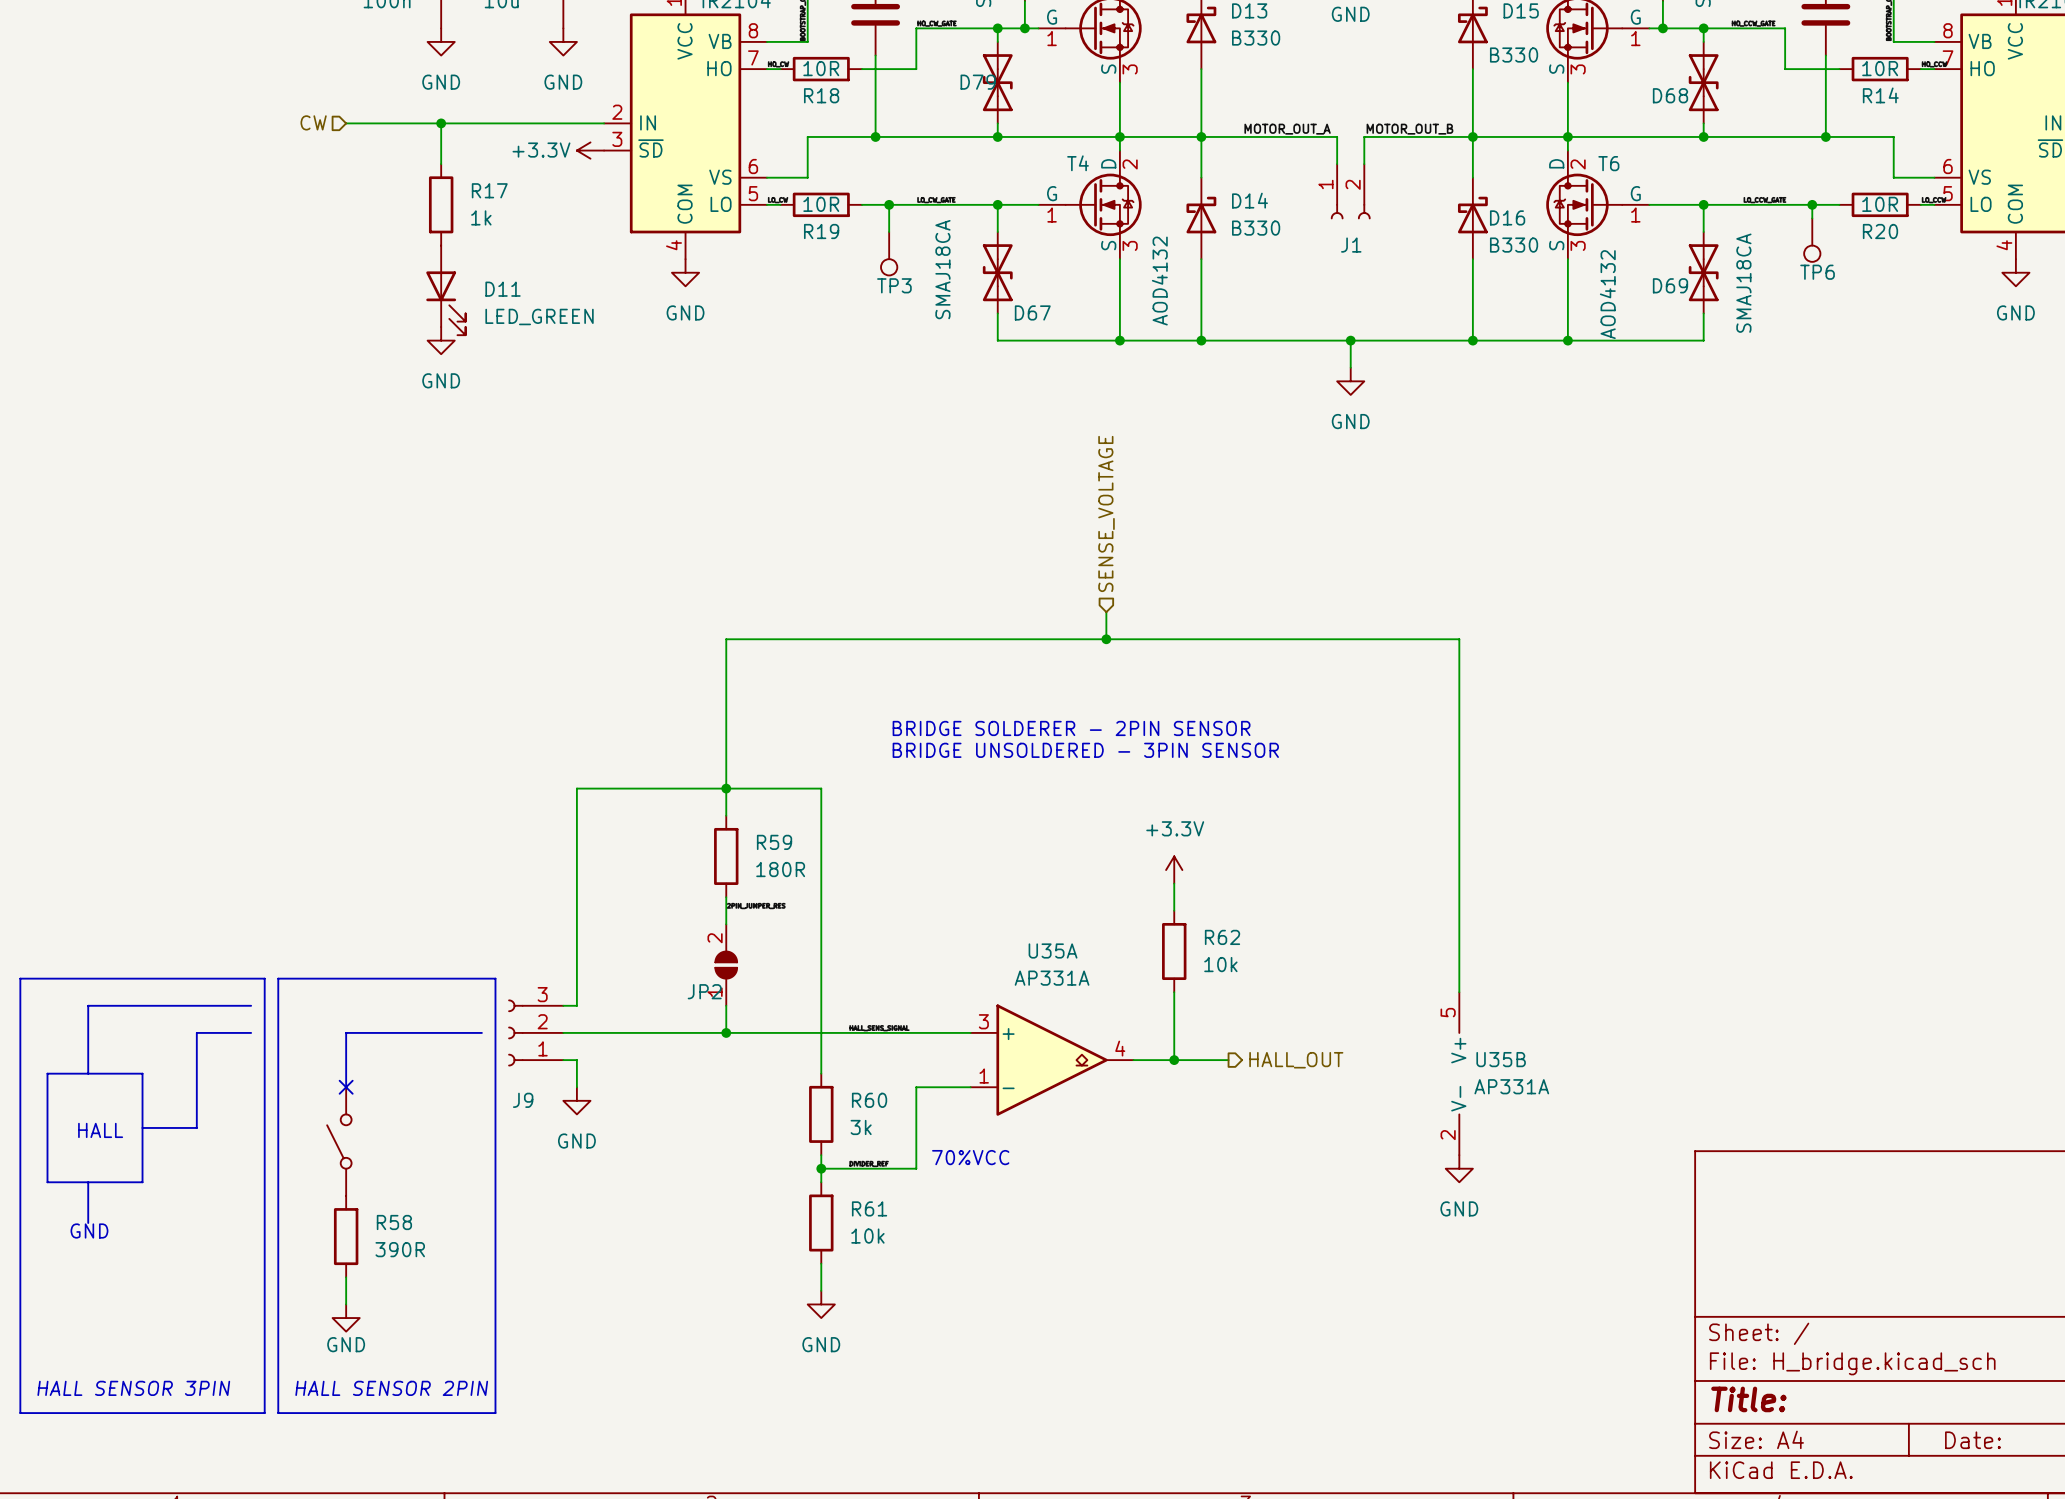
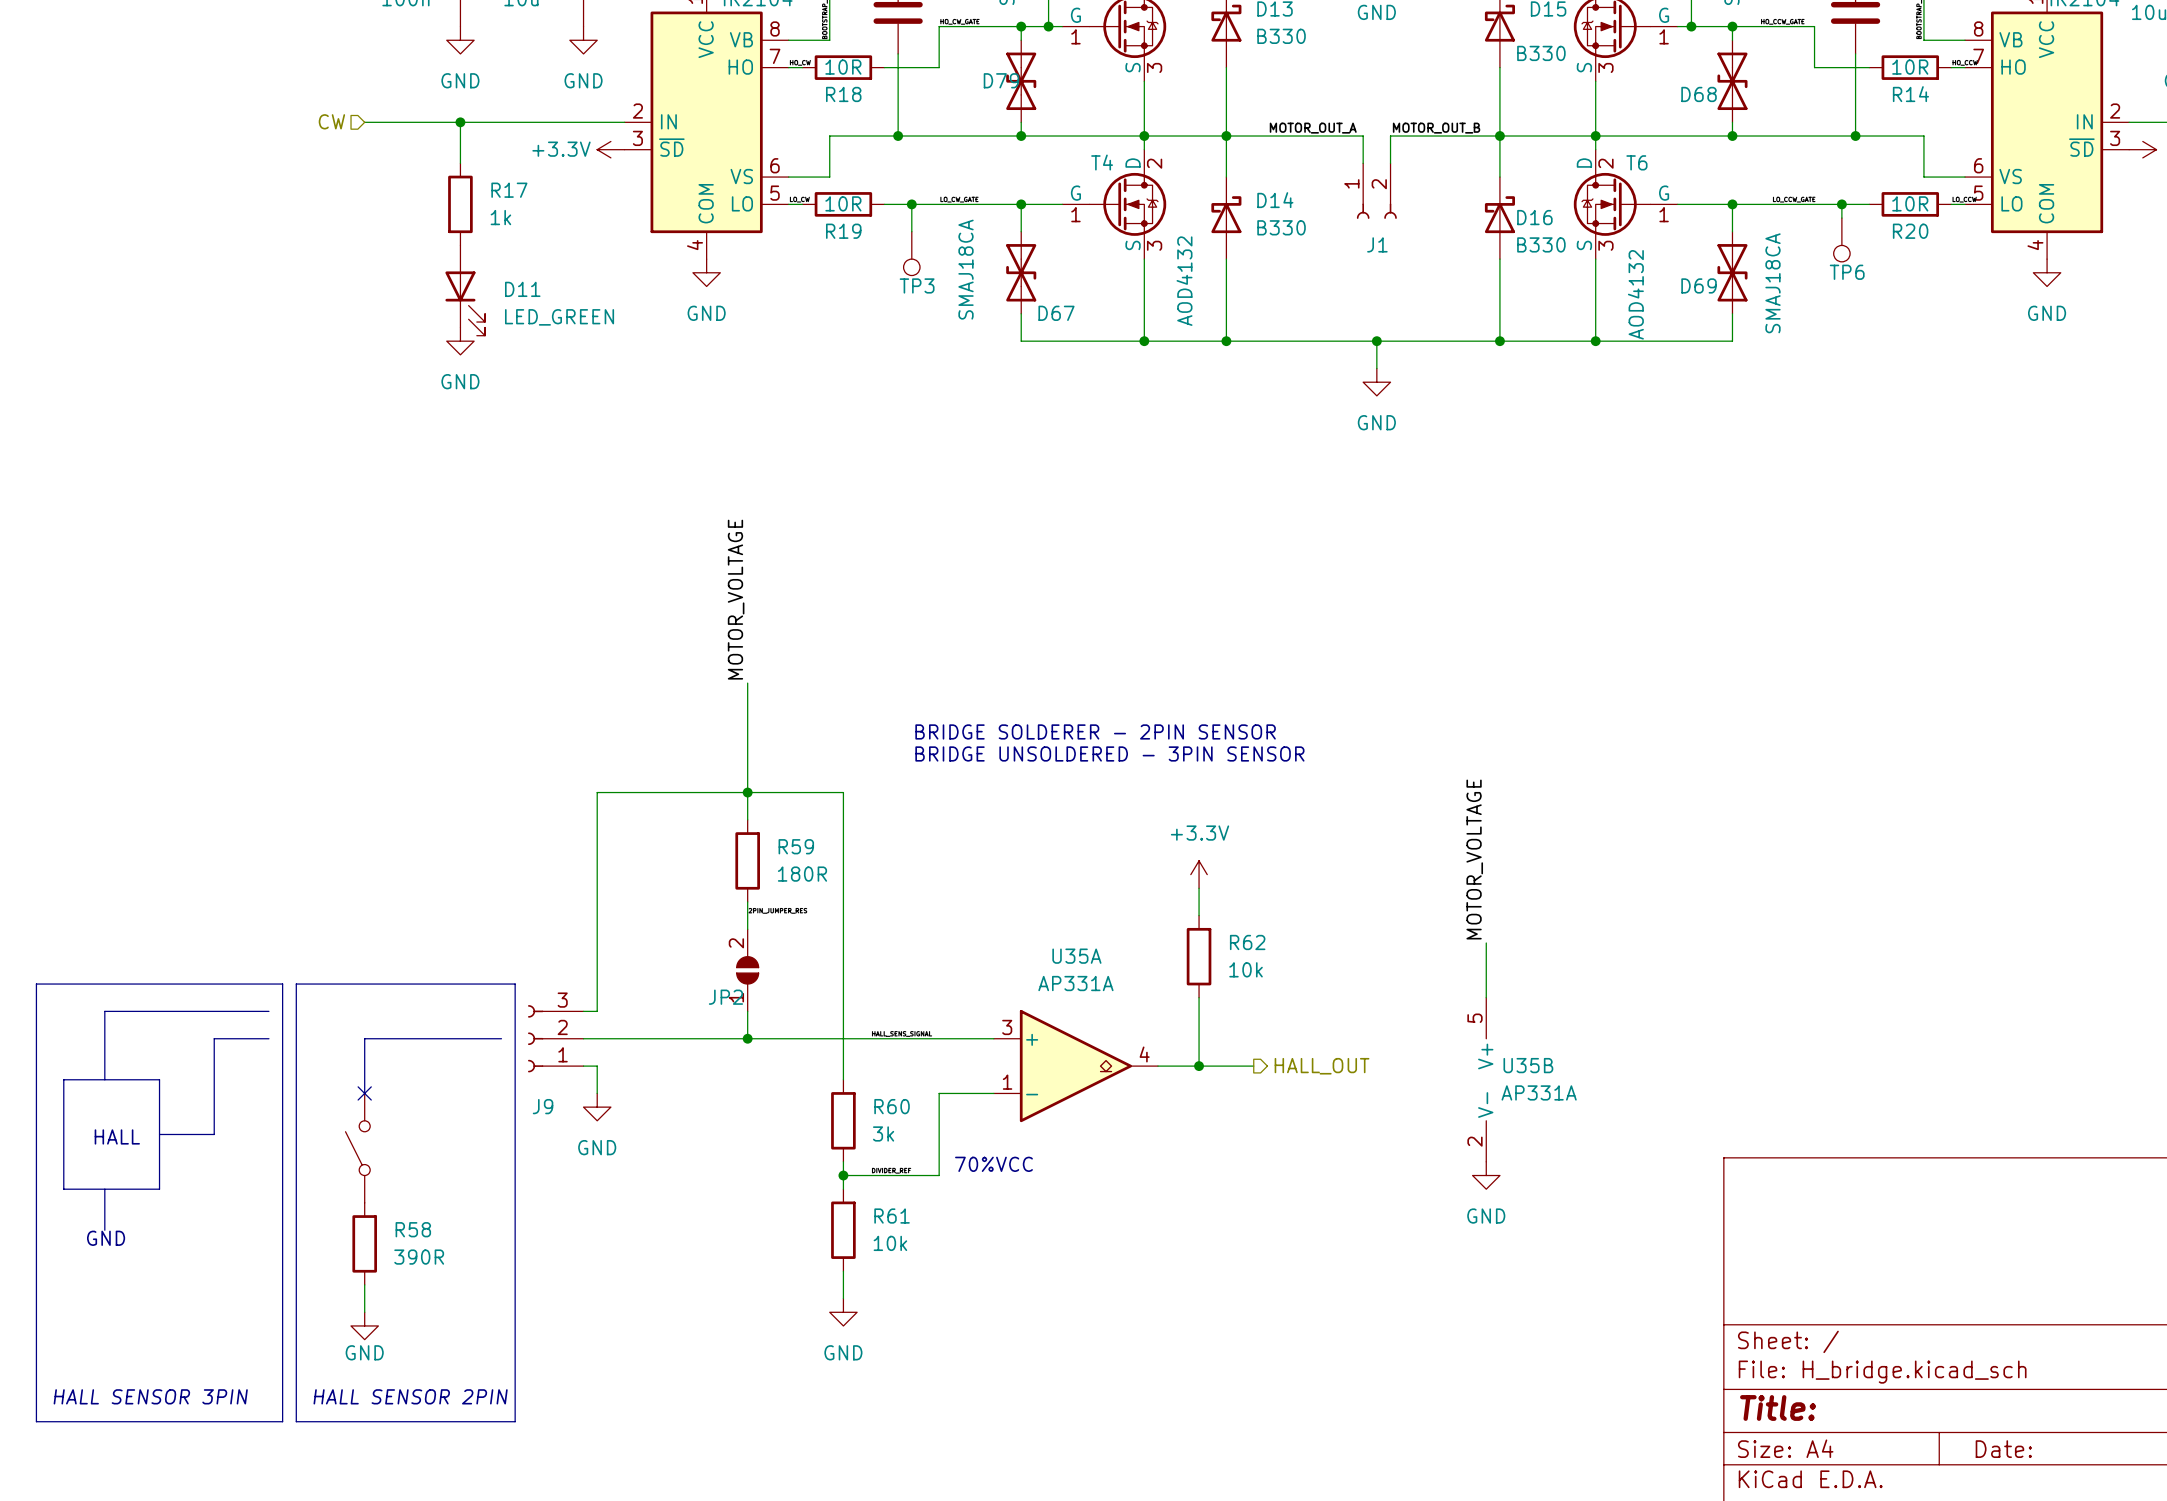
hierarchical label: SENSE_VOLTAGE (1106, 513) -> none
label: none -> MOTOR_VOLTAGE (736, 599)
wire: (1106, 612) (1106, 639) -> none
junction: (1106, 639) -> none
wire: (726, 679) (726, 639) (1459, 639) (1459, 937) -> none
label: none -> MOTOR_VOLTAGE (1474, 859)

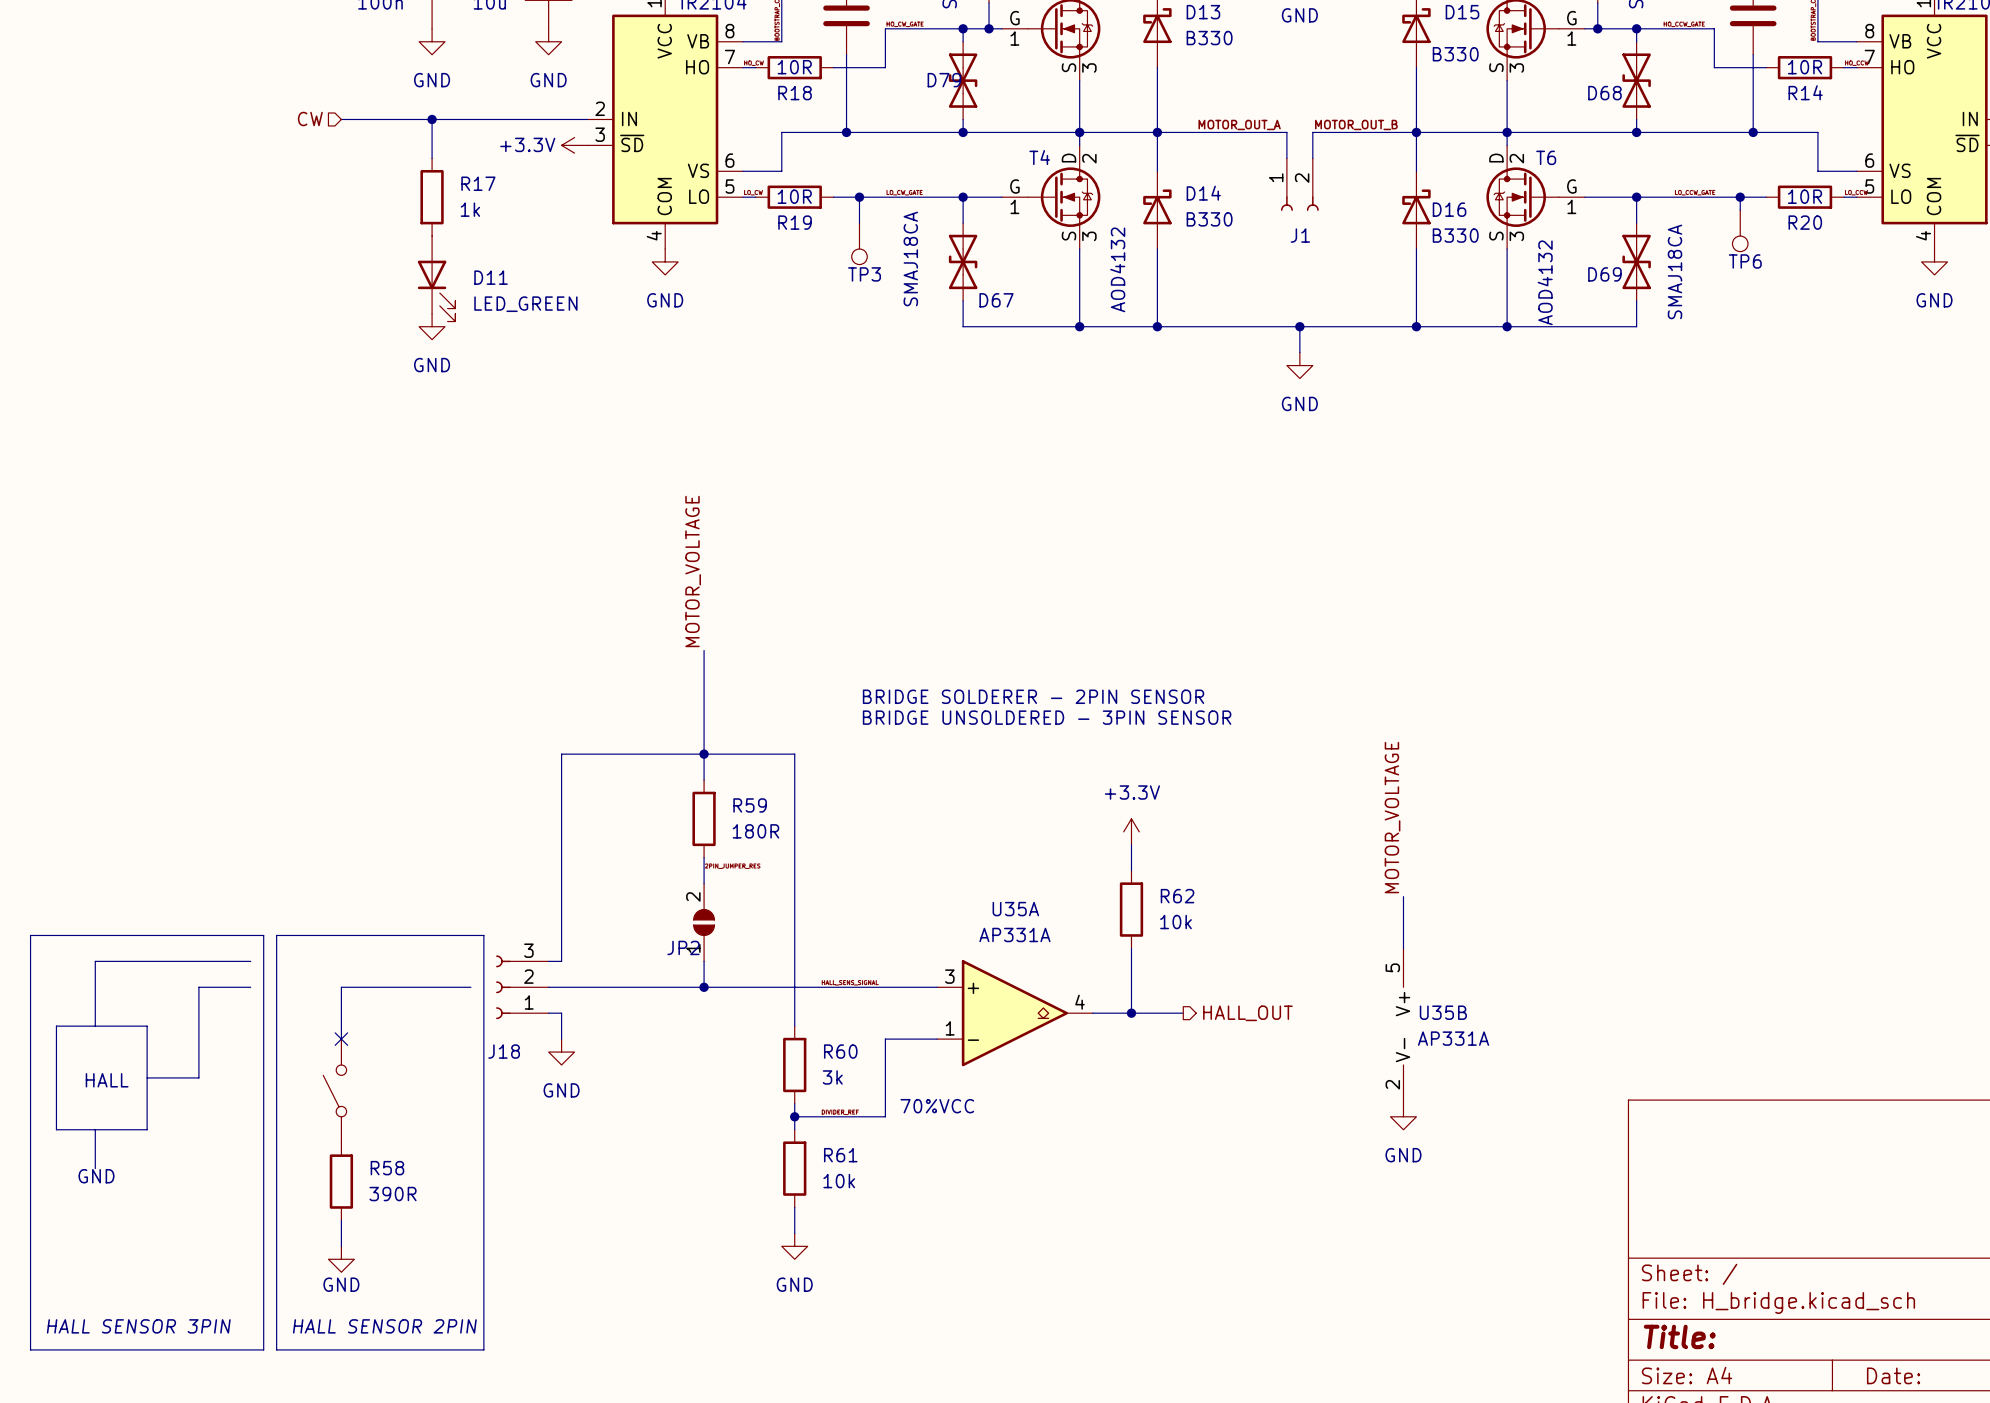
J9 name: J9 (543, 1106) -> J18 (504, 1051)

